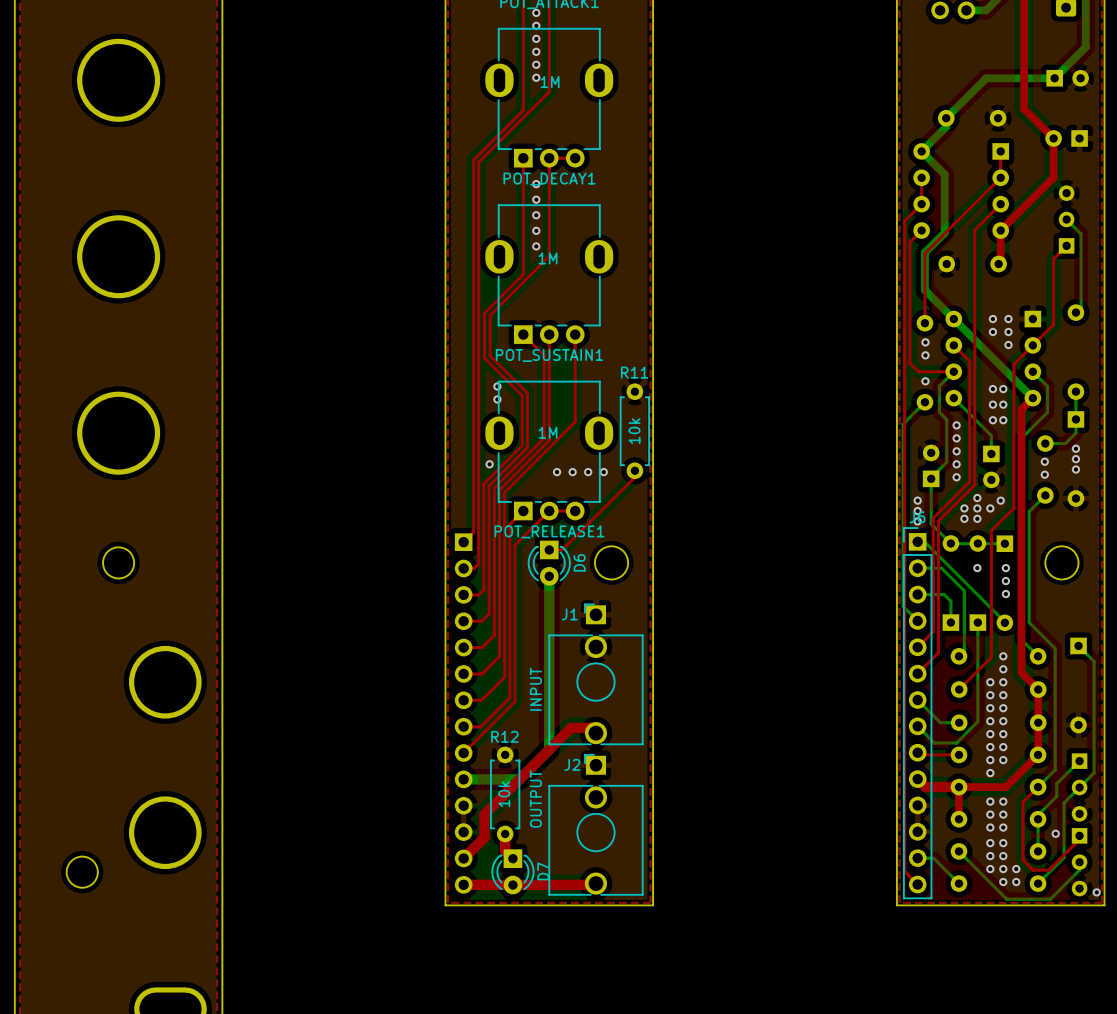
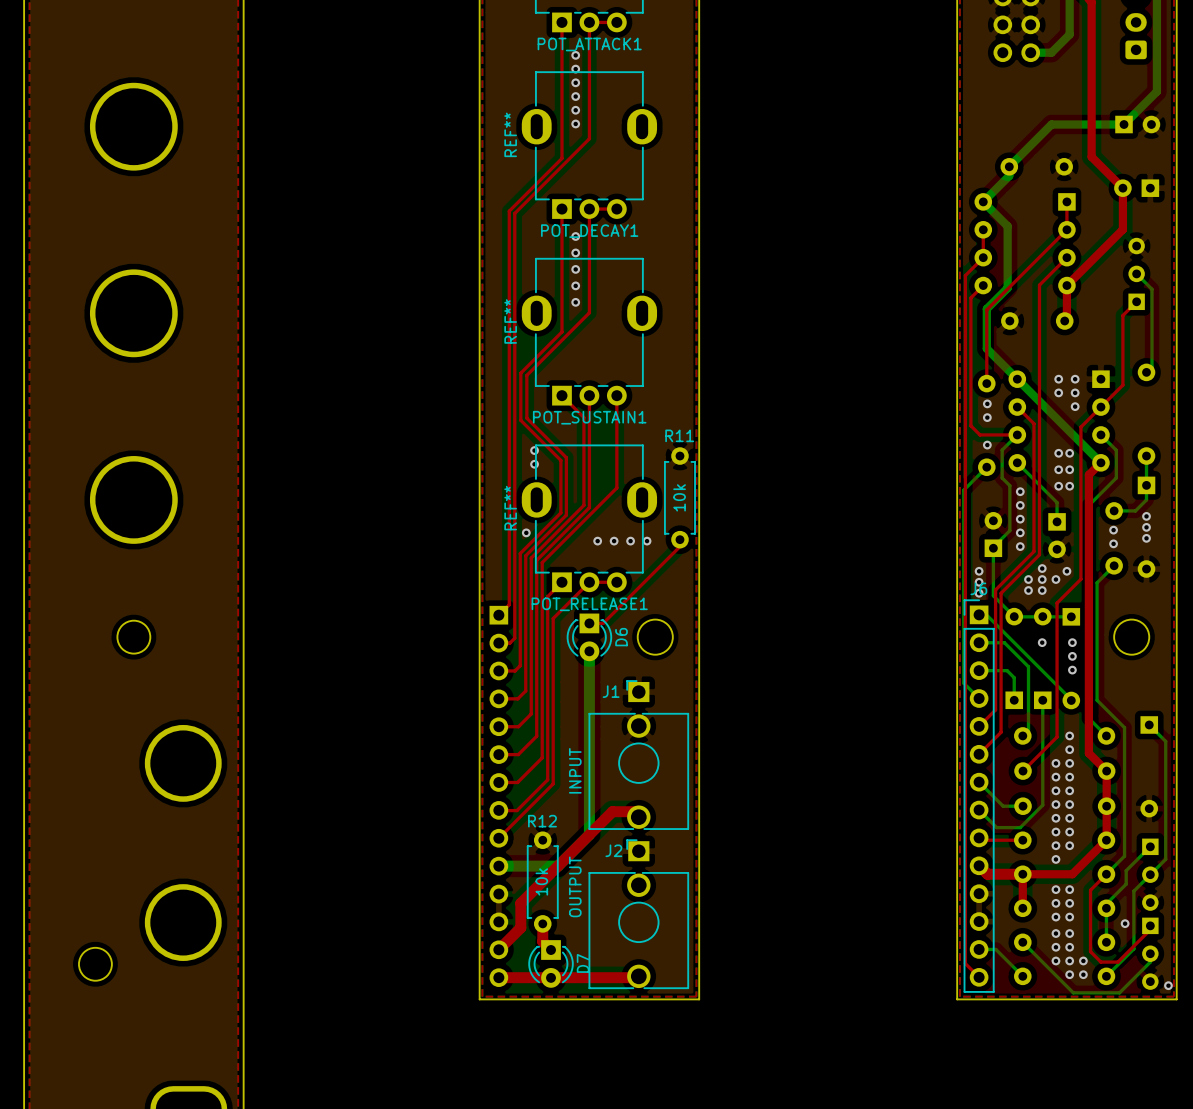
POT_DECAY1 text: 1M (550, 82) -> none
POT_DECAY1 text: none -> REF** (510, 134)
POT_SUSTAIN1 text: 1M (547, 258) -> none
POT_SUSTAIN1 text: none -> REF** (510, 321)
POT_RELEASE1 text: 1M (547, 432) -> none
POT_RELEASE1 text: none -> REF** (510, 508)

